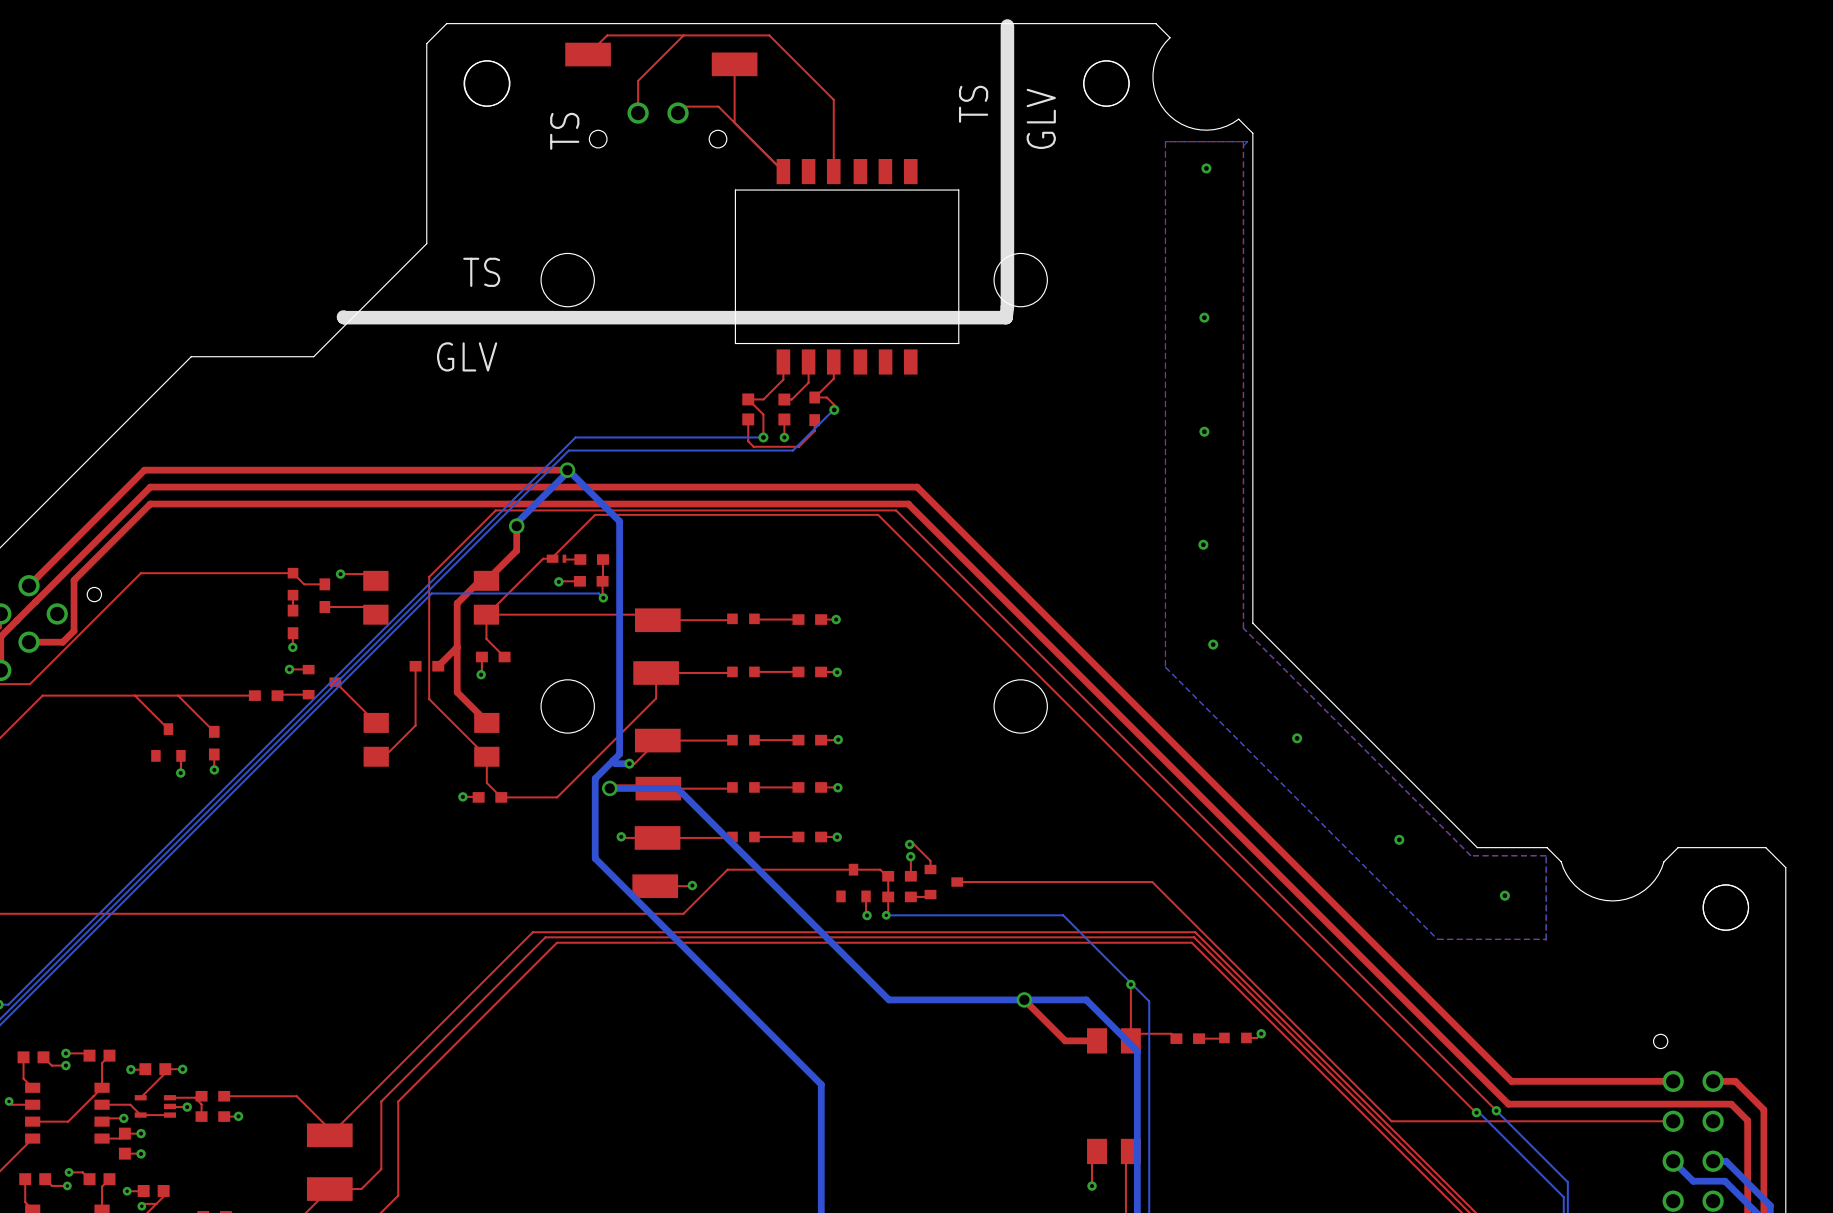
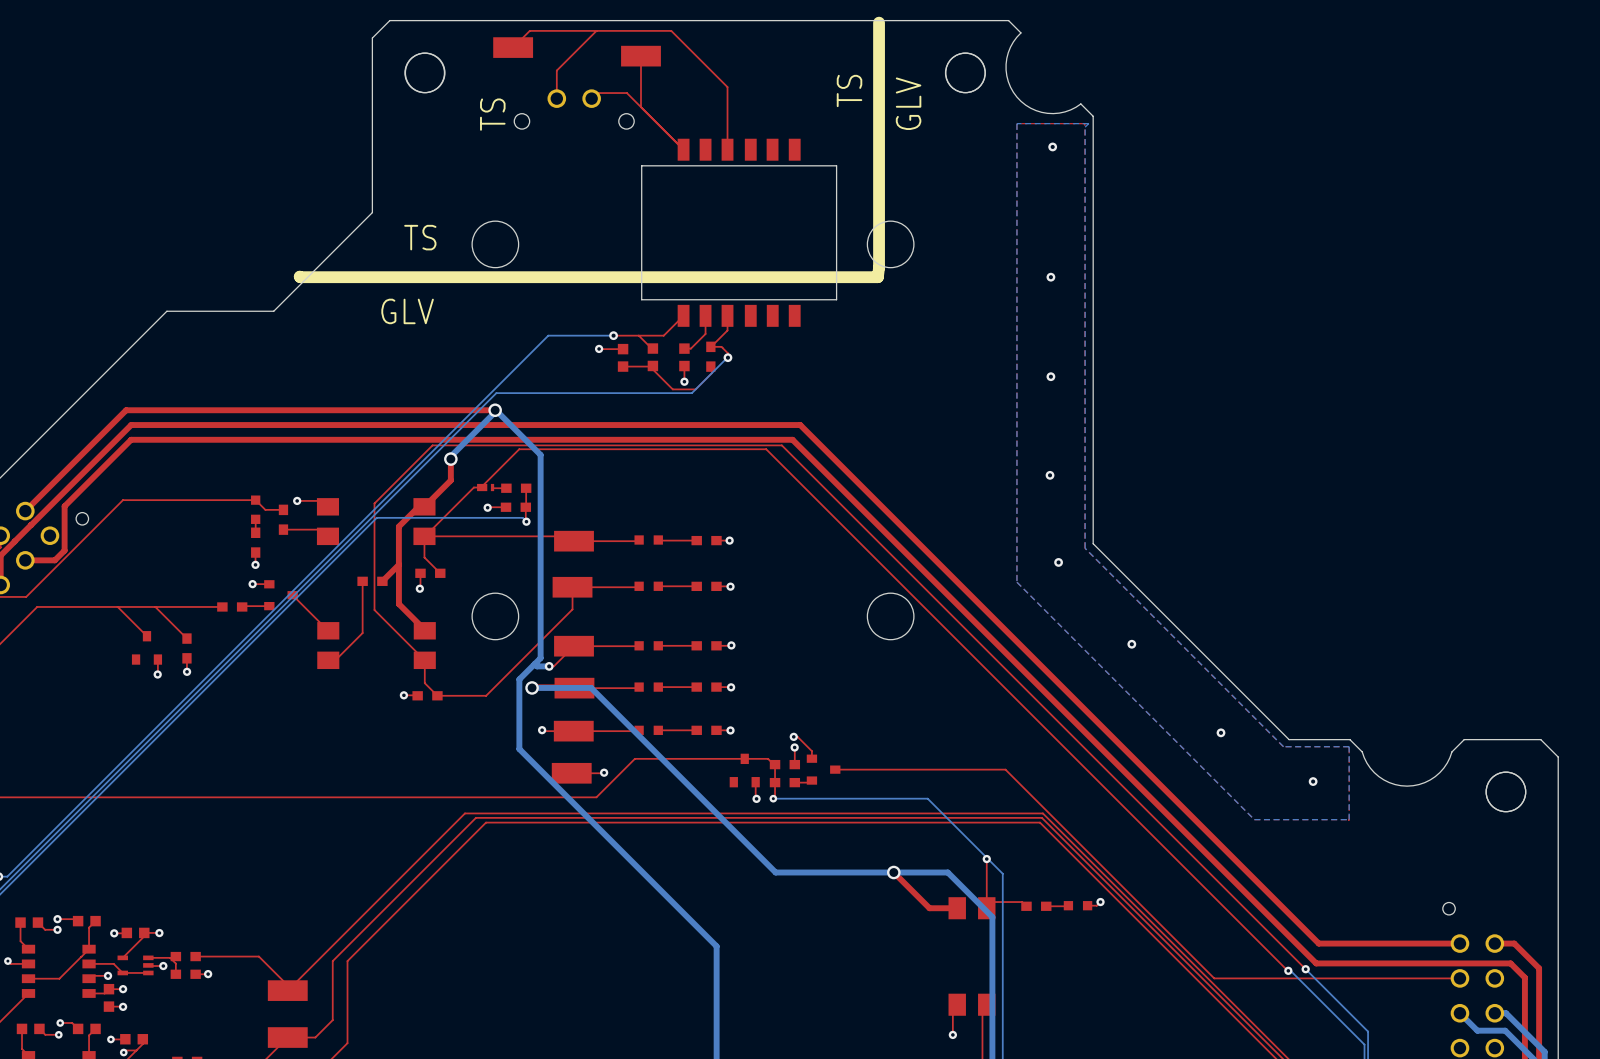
top track: (783, 361) (783, 379) (763, 399) (748, 399) (763, 414) (763, 437) -> (683, 315) (663, 335) (613, 335)
via: none -> (613, 335)
top track: none -> (638, 335) (649, 346)
top track: none -> (599, 348) (623, 349)
via: none -> (599, 348)
part: none -> (623, 357)
top track: (748, 419) (748, 441) (753, 446) (798, 446) (814, 431) (814, 420) -> none
top track: none -> (623, 366) (649, 366) (672, 389) (695, 389) (712, 372) (712, 367)
bottom track: (763, 437) (575, 437) -> (613, 335) (548, 335) (502, 381)
via: (763, 437) -> none

